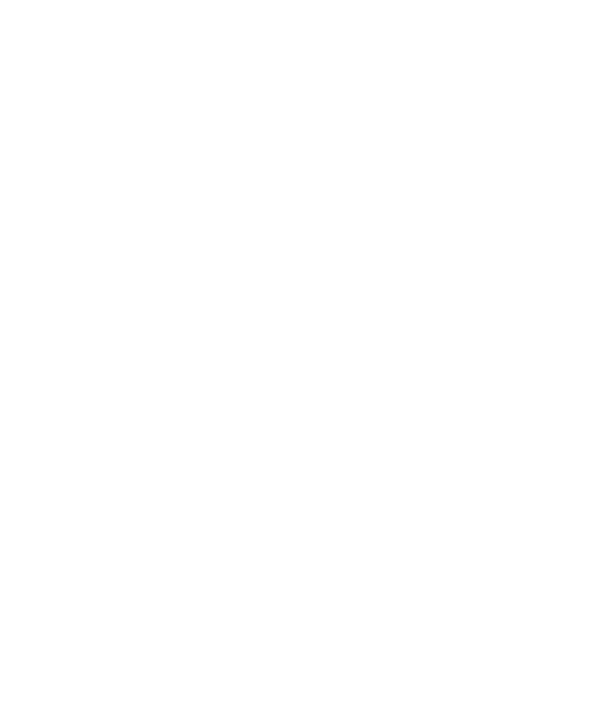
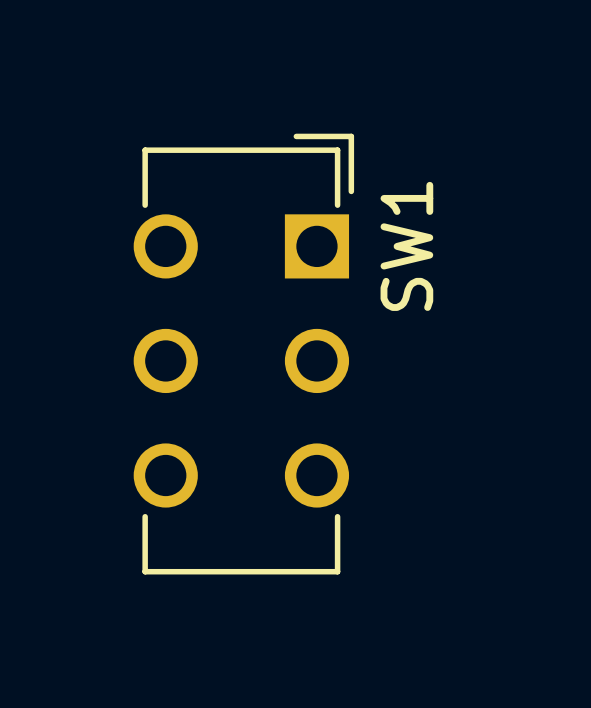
SW1: none -> (243, 354)

